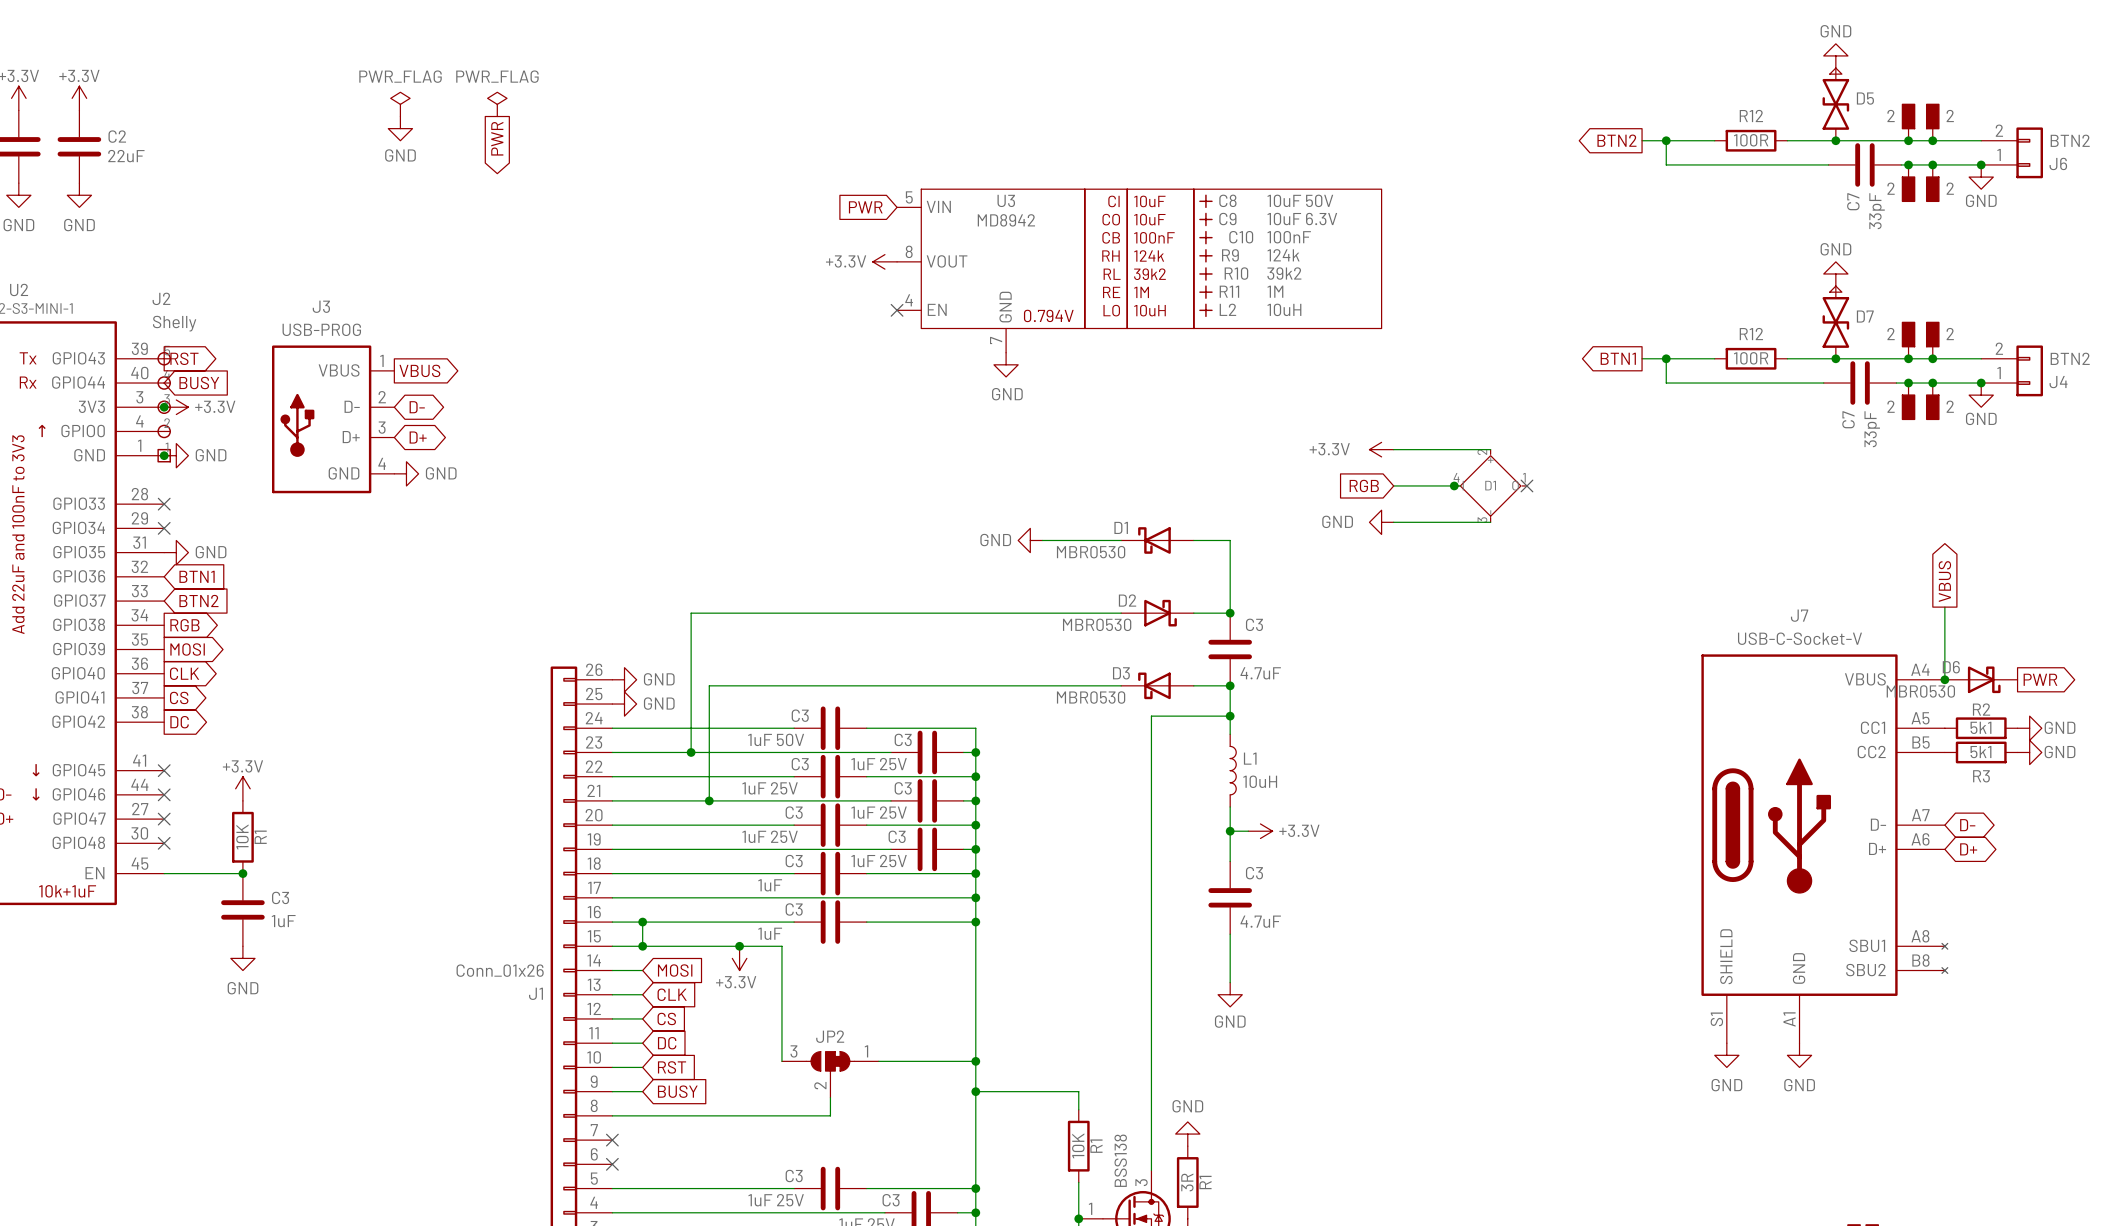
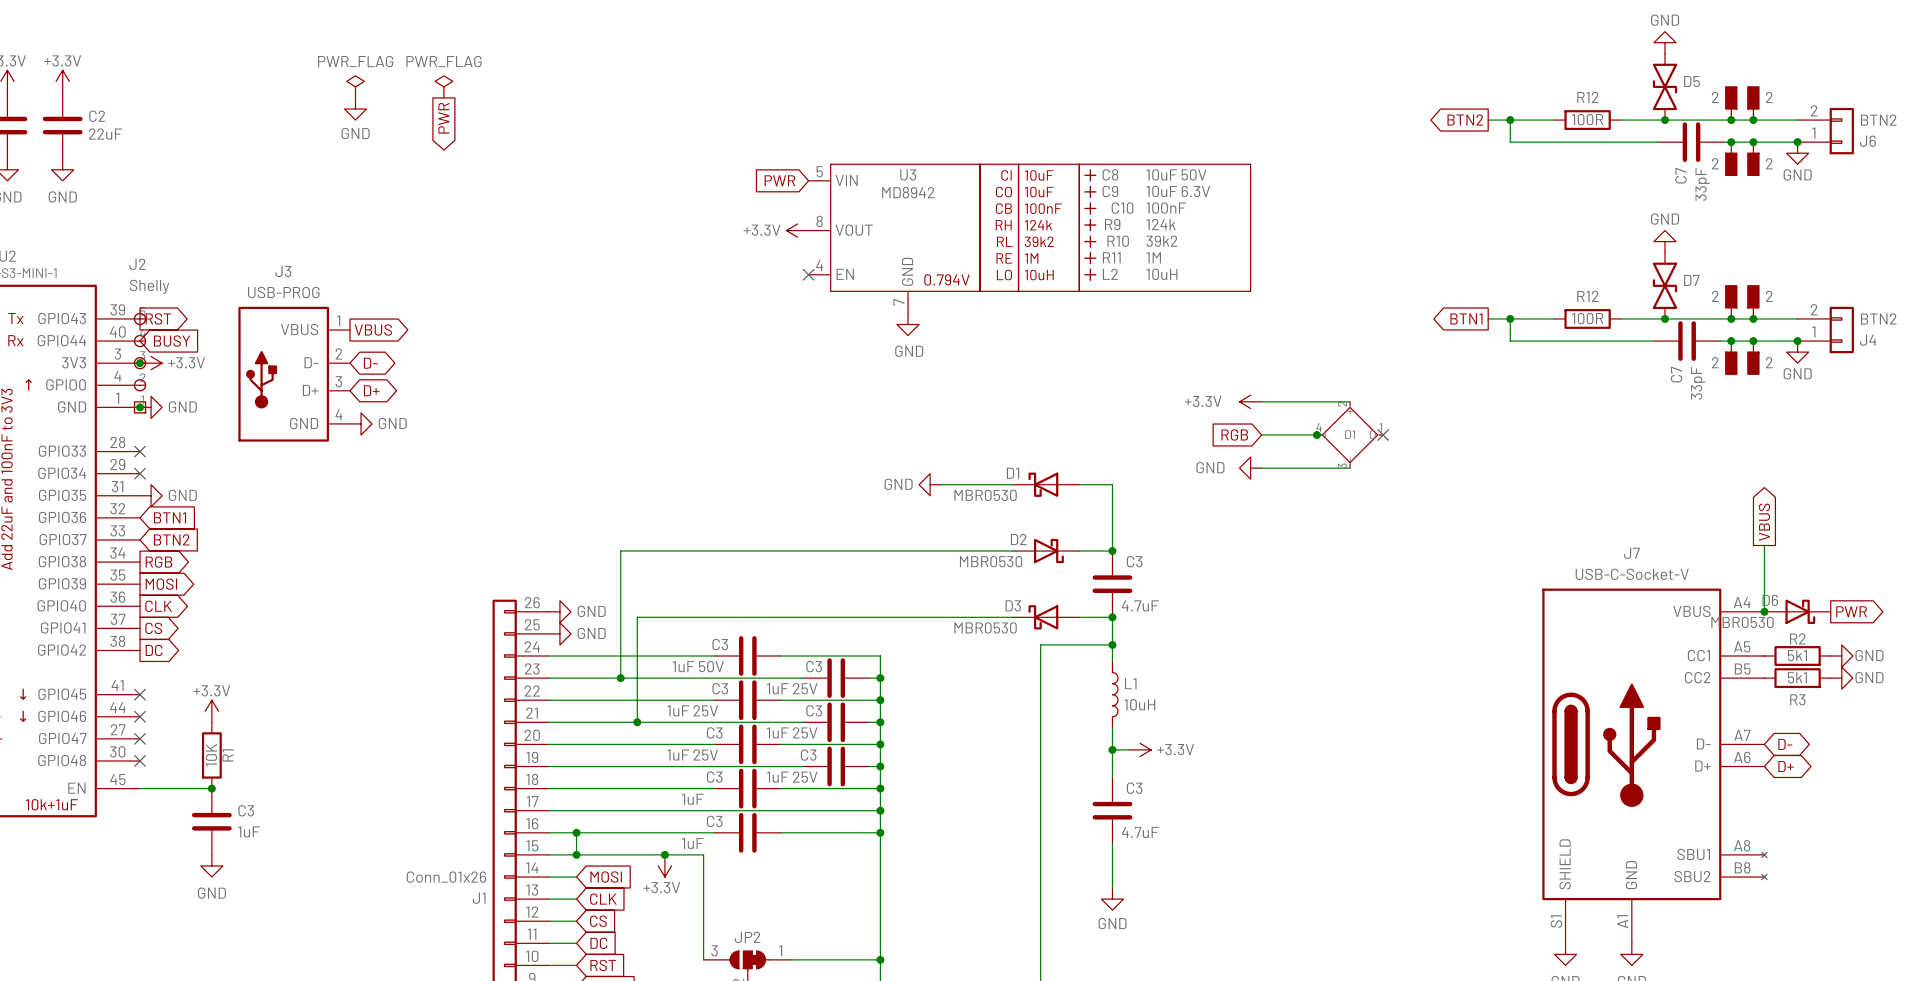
D5 symbol: [1822, 68, 1850, 141] -> [1652, 53, 1678, 121]
D7 symbol: [1822, 286, 1850, 359] -> [1652, 252, 1678, 319]

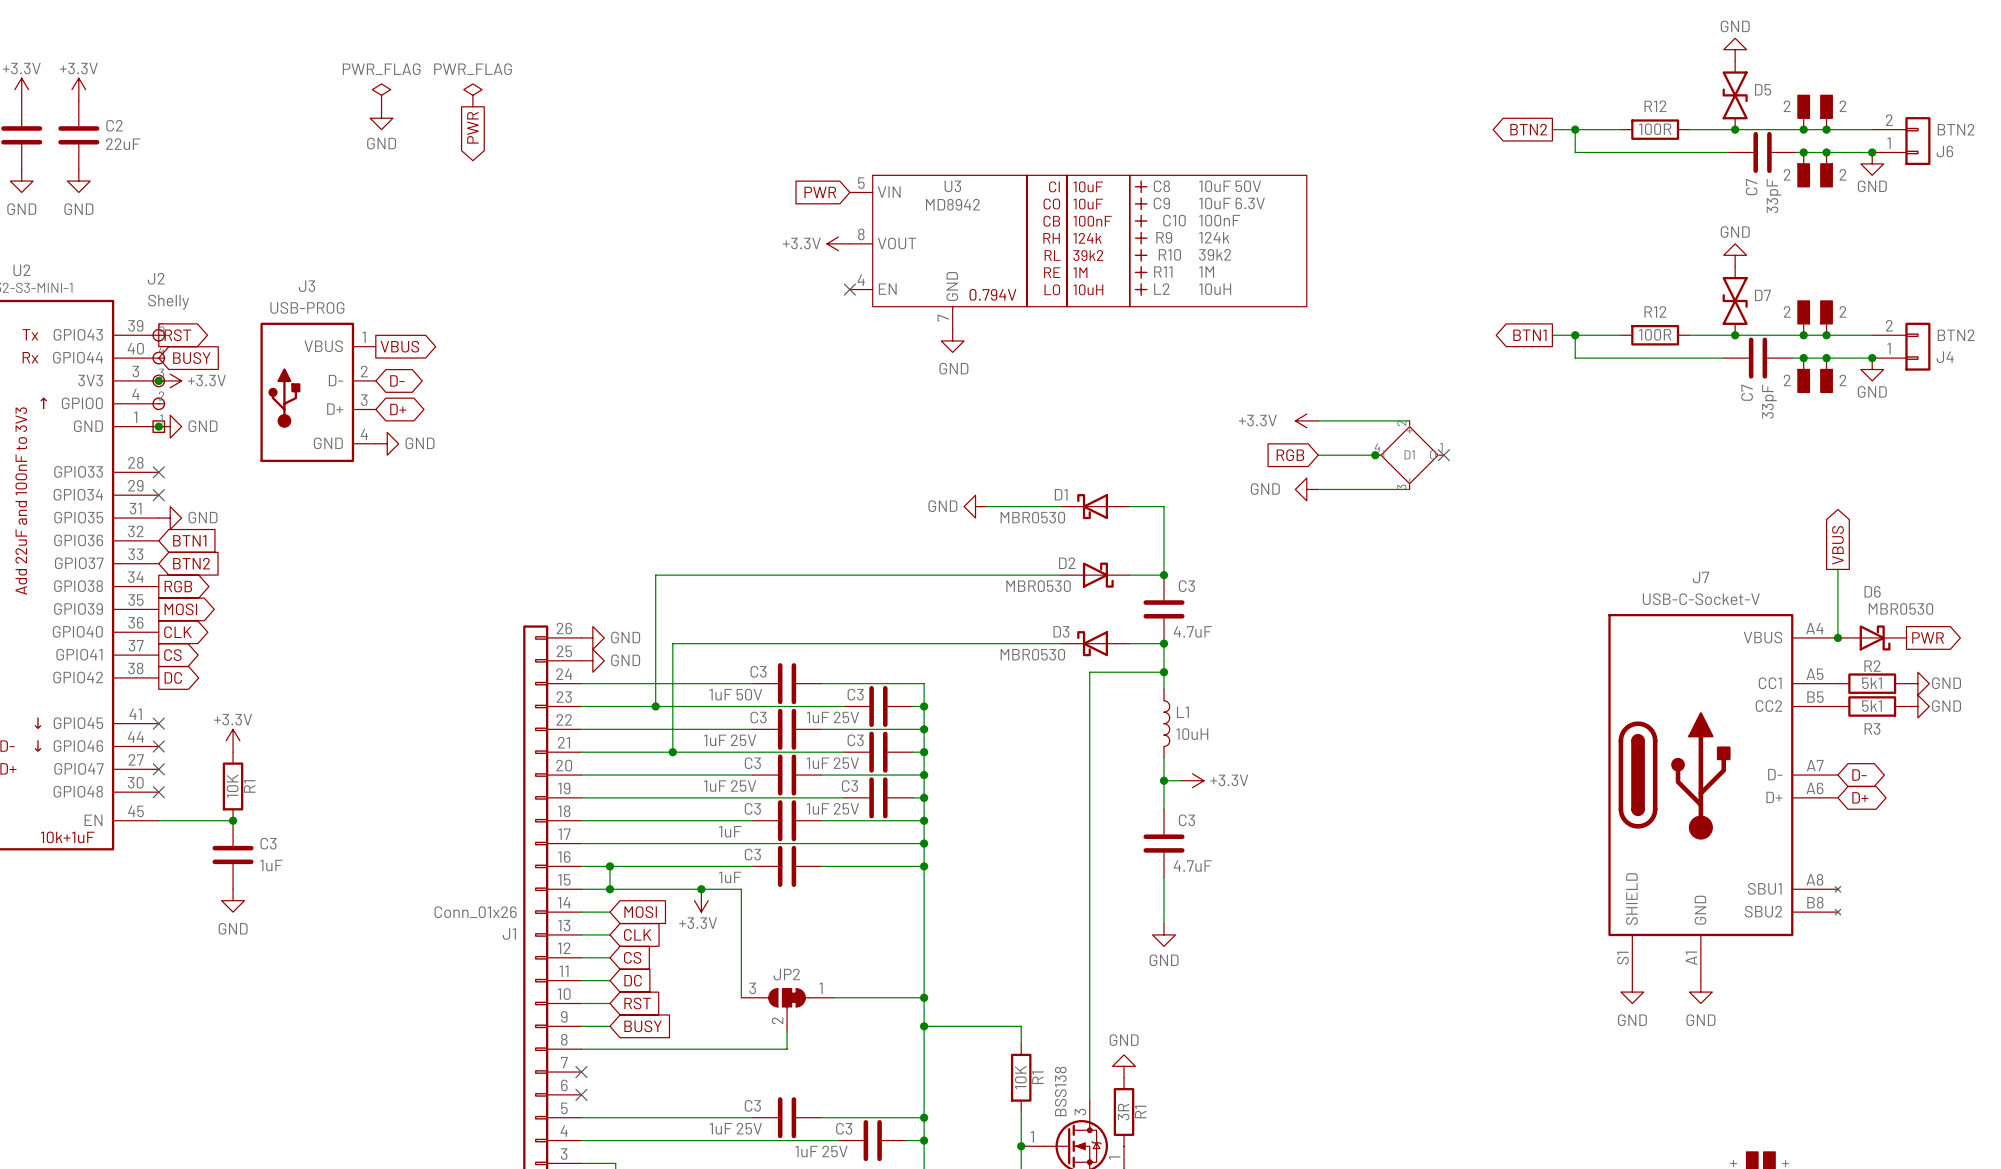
D6 name position: D6 (1770, 600) -> D6 (1872, 591)
D6 value position: MBR0530 (1742, 622) -> MBR0530 (1900, 608)

